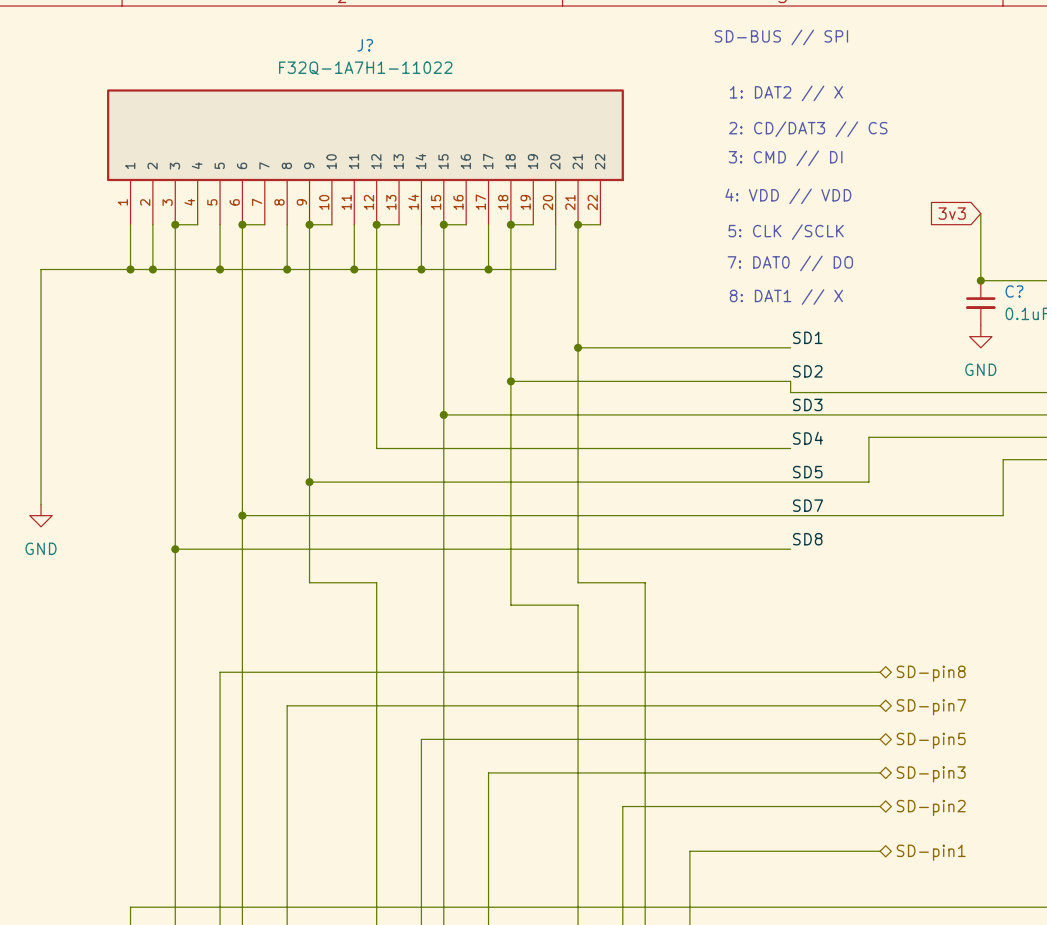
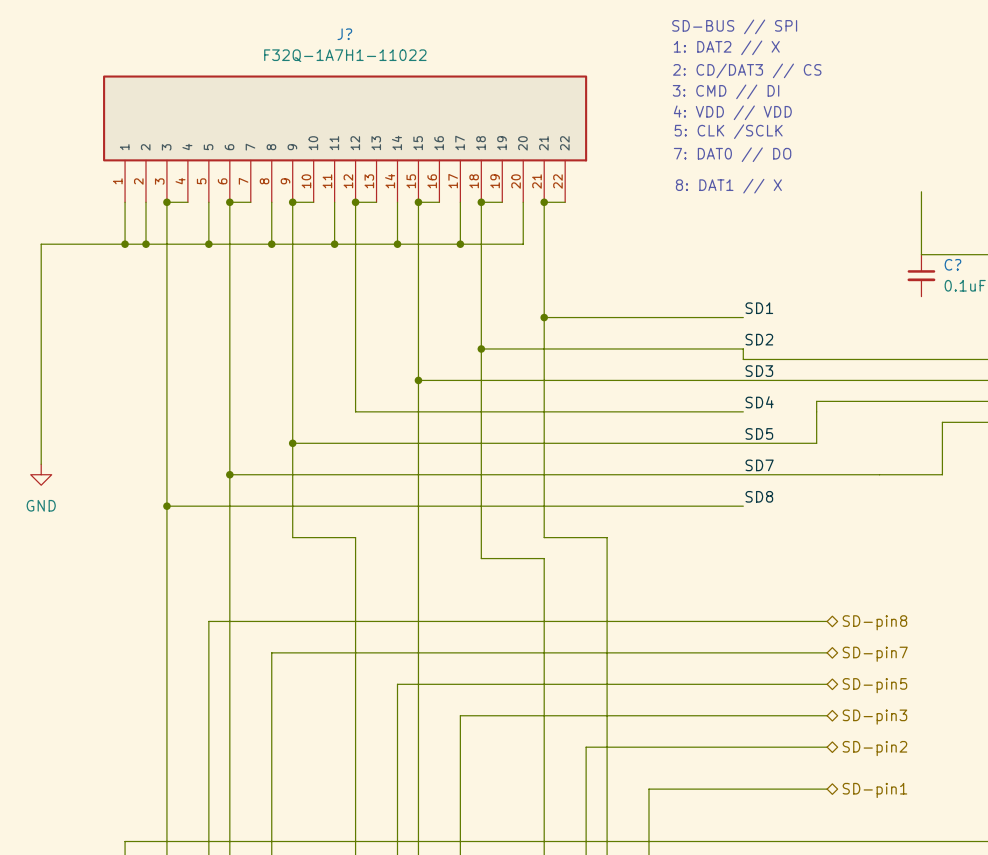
text position: 1: DAT2 // X (786, 93) -> 1: DAT2 // X (726, 47)
text position: 2: CD/DAT3 // CS (808, 129) -> 2: CD/DAT3 // CS (747, 70)
text position: 3: CMD // DI (785, 158) -> 3: CMD // DI (726, 91)
text position: 4: VDD // VDD (788, 196) -> 4: VDD // VDD (732, 112)
global label: 3v3 (952, 213) -> none
text position: 5: CLK /SCLK (786, 232) -> 5: CLK /SCLK (728, 131)
text position: 7: DAT0 // DO (790, 263) -> 7: DAT0 // DO (732, 154)
junction: (980, 280) -> none
text position: 8: DAT1 // X (786, 297) -> 8: DAT1 // X (728, 186)
power symbol: GND (980, 336) -> none

